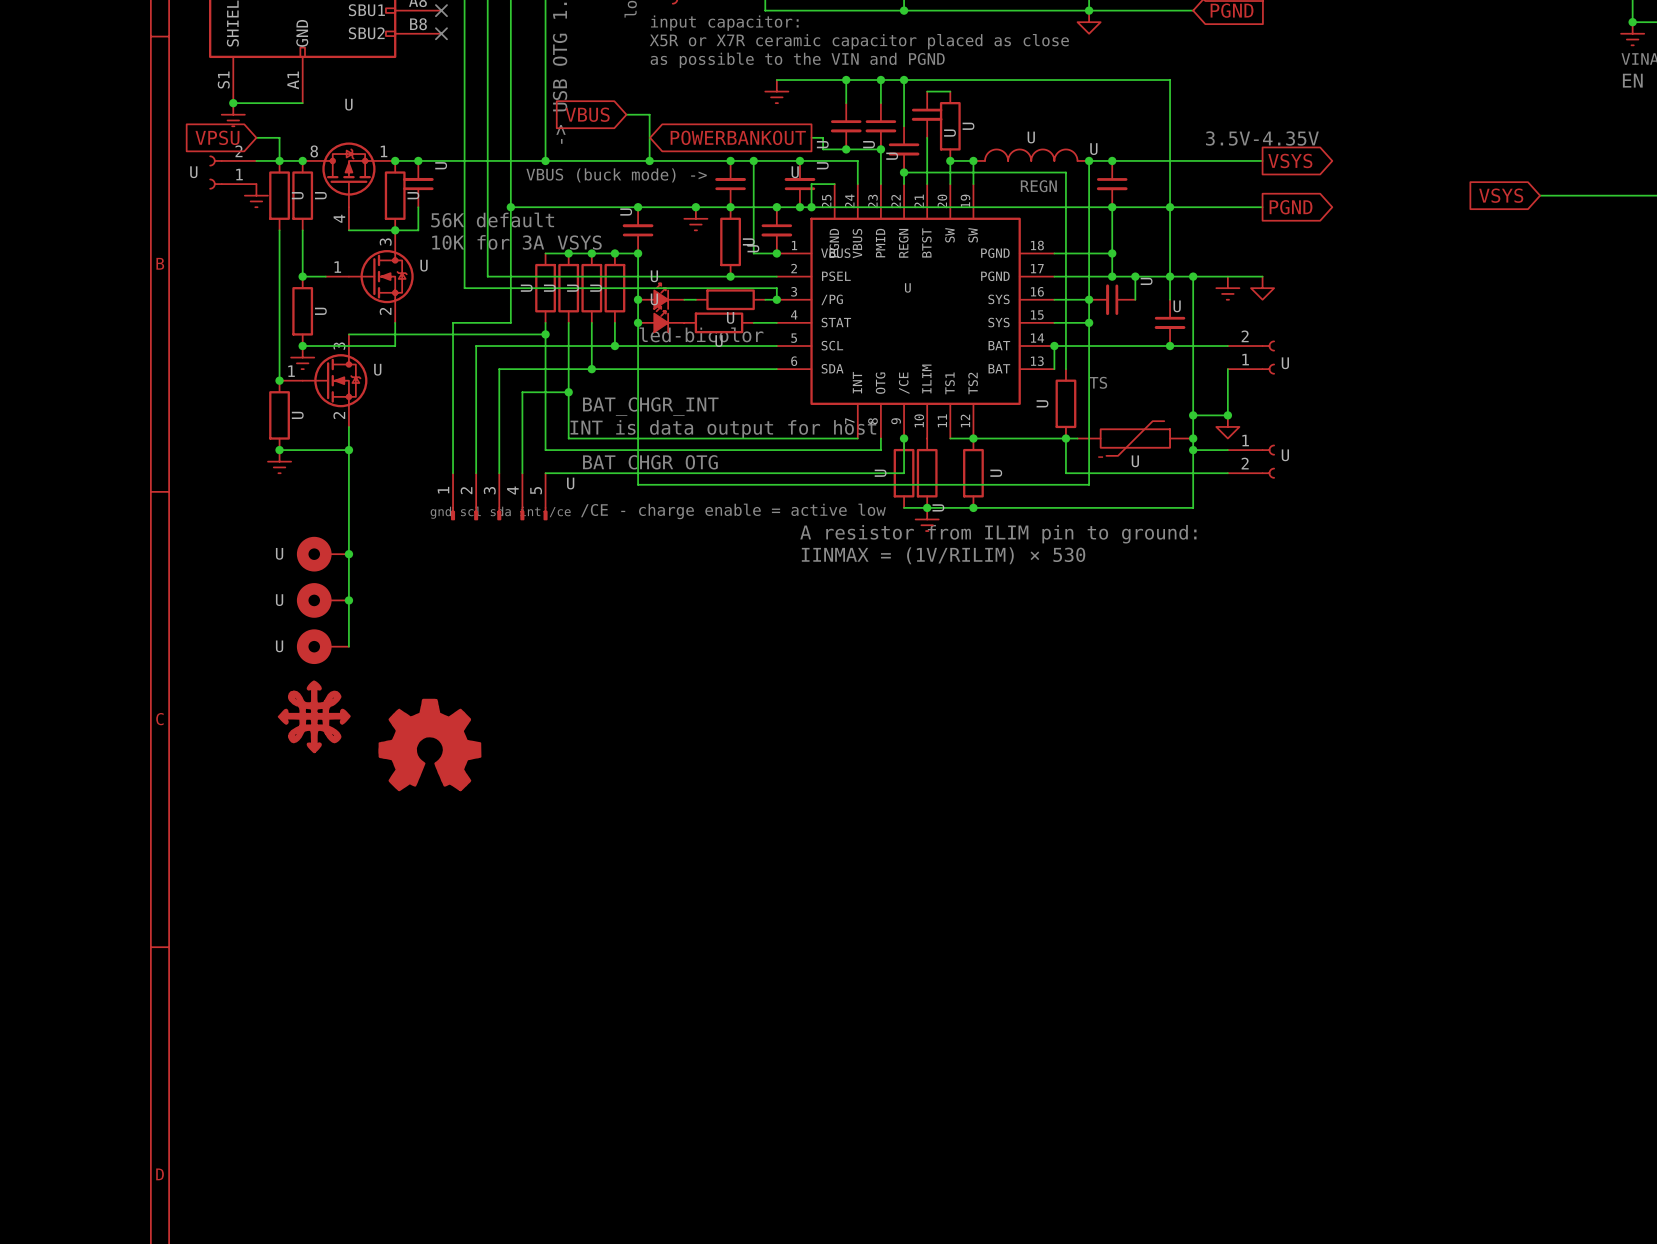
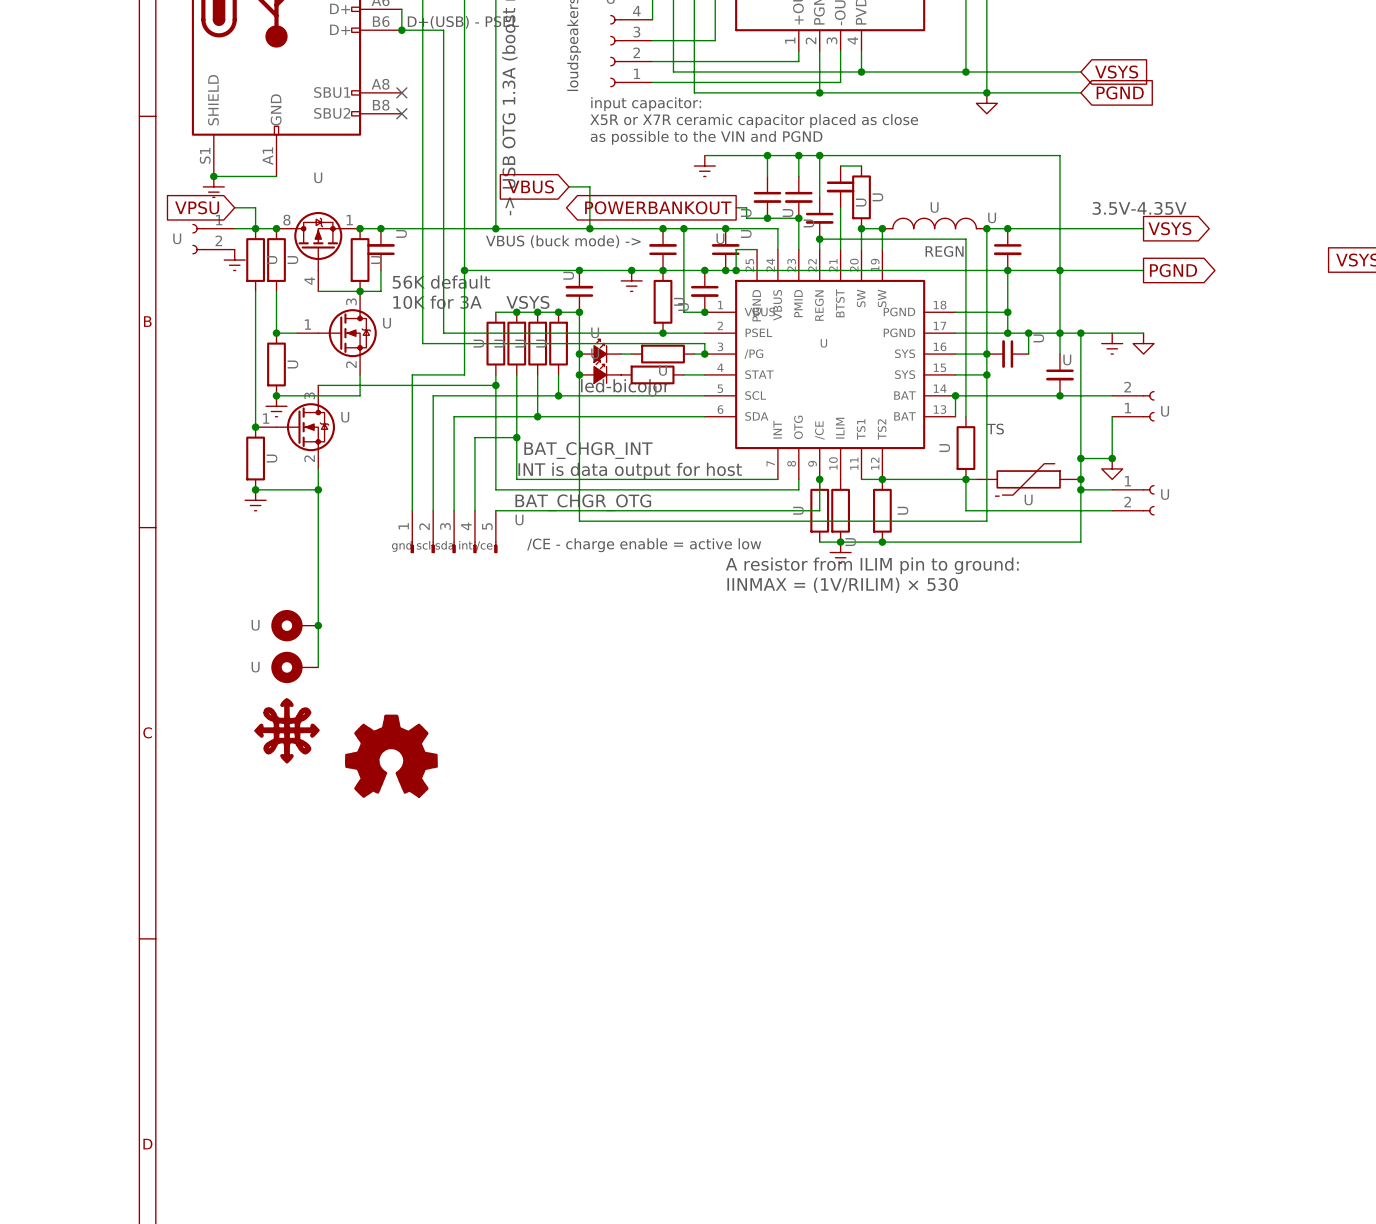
U flip: as is (215, 172) -> up-down (198, 239)
U: (322, 554) -> none
junction: (348, 554) -> none

